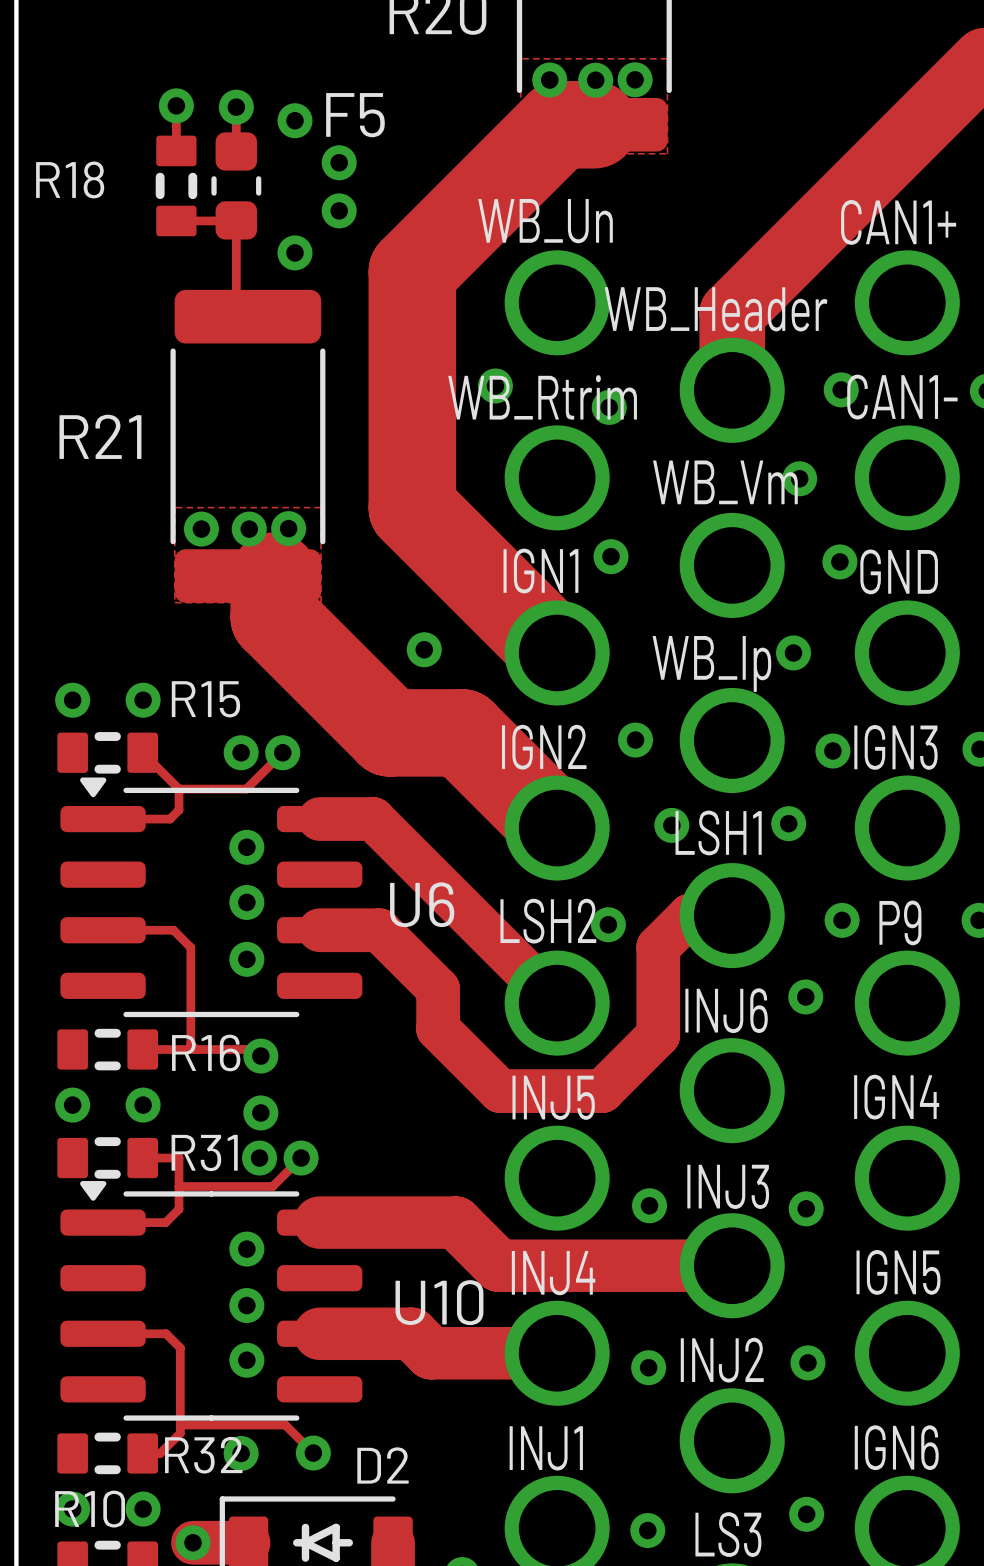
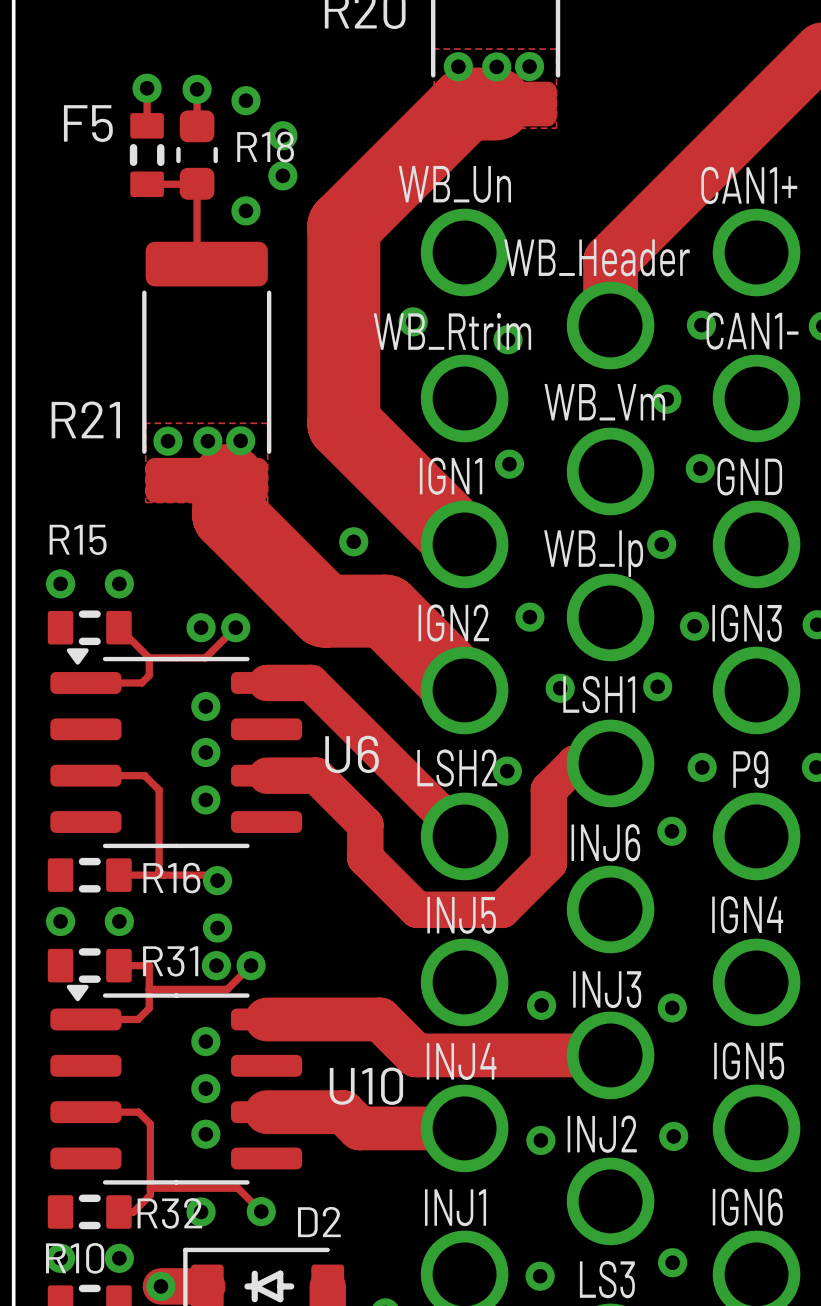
F5 name position: F5 (355, 115) -> F5 (88, 123)
R18 name position: R18 (70, 179) -> R18 (265, 146)
R21 name position: R21 (100, 436) -> R21 (85, 419)
R15 name position: R15 (205, 699) -> R15 (78, 539)

